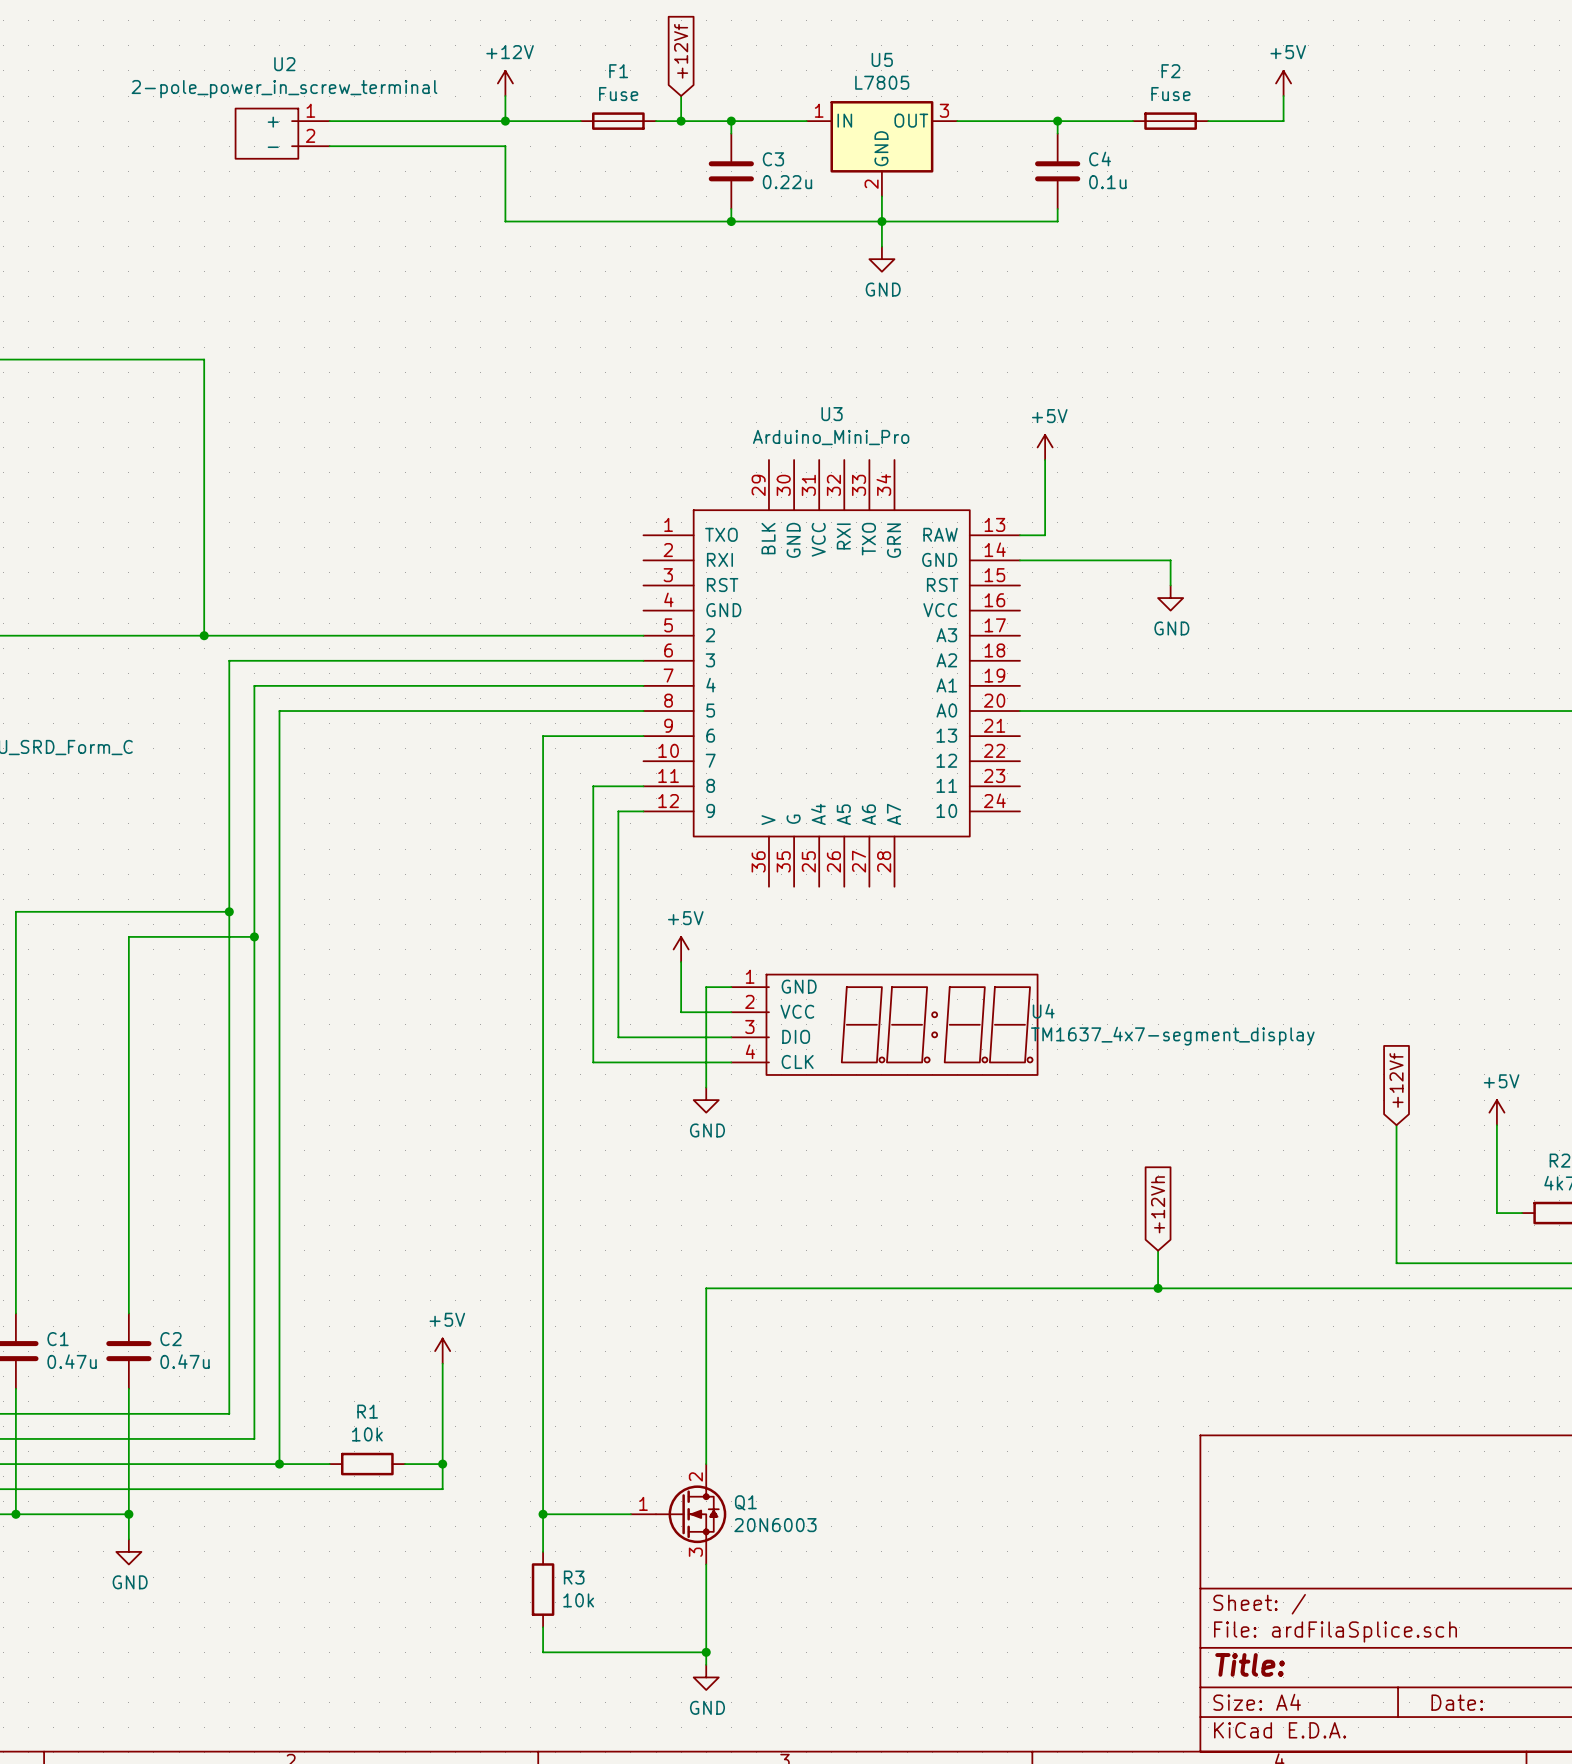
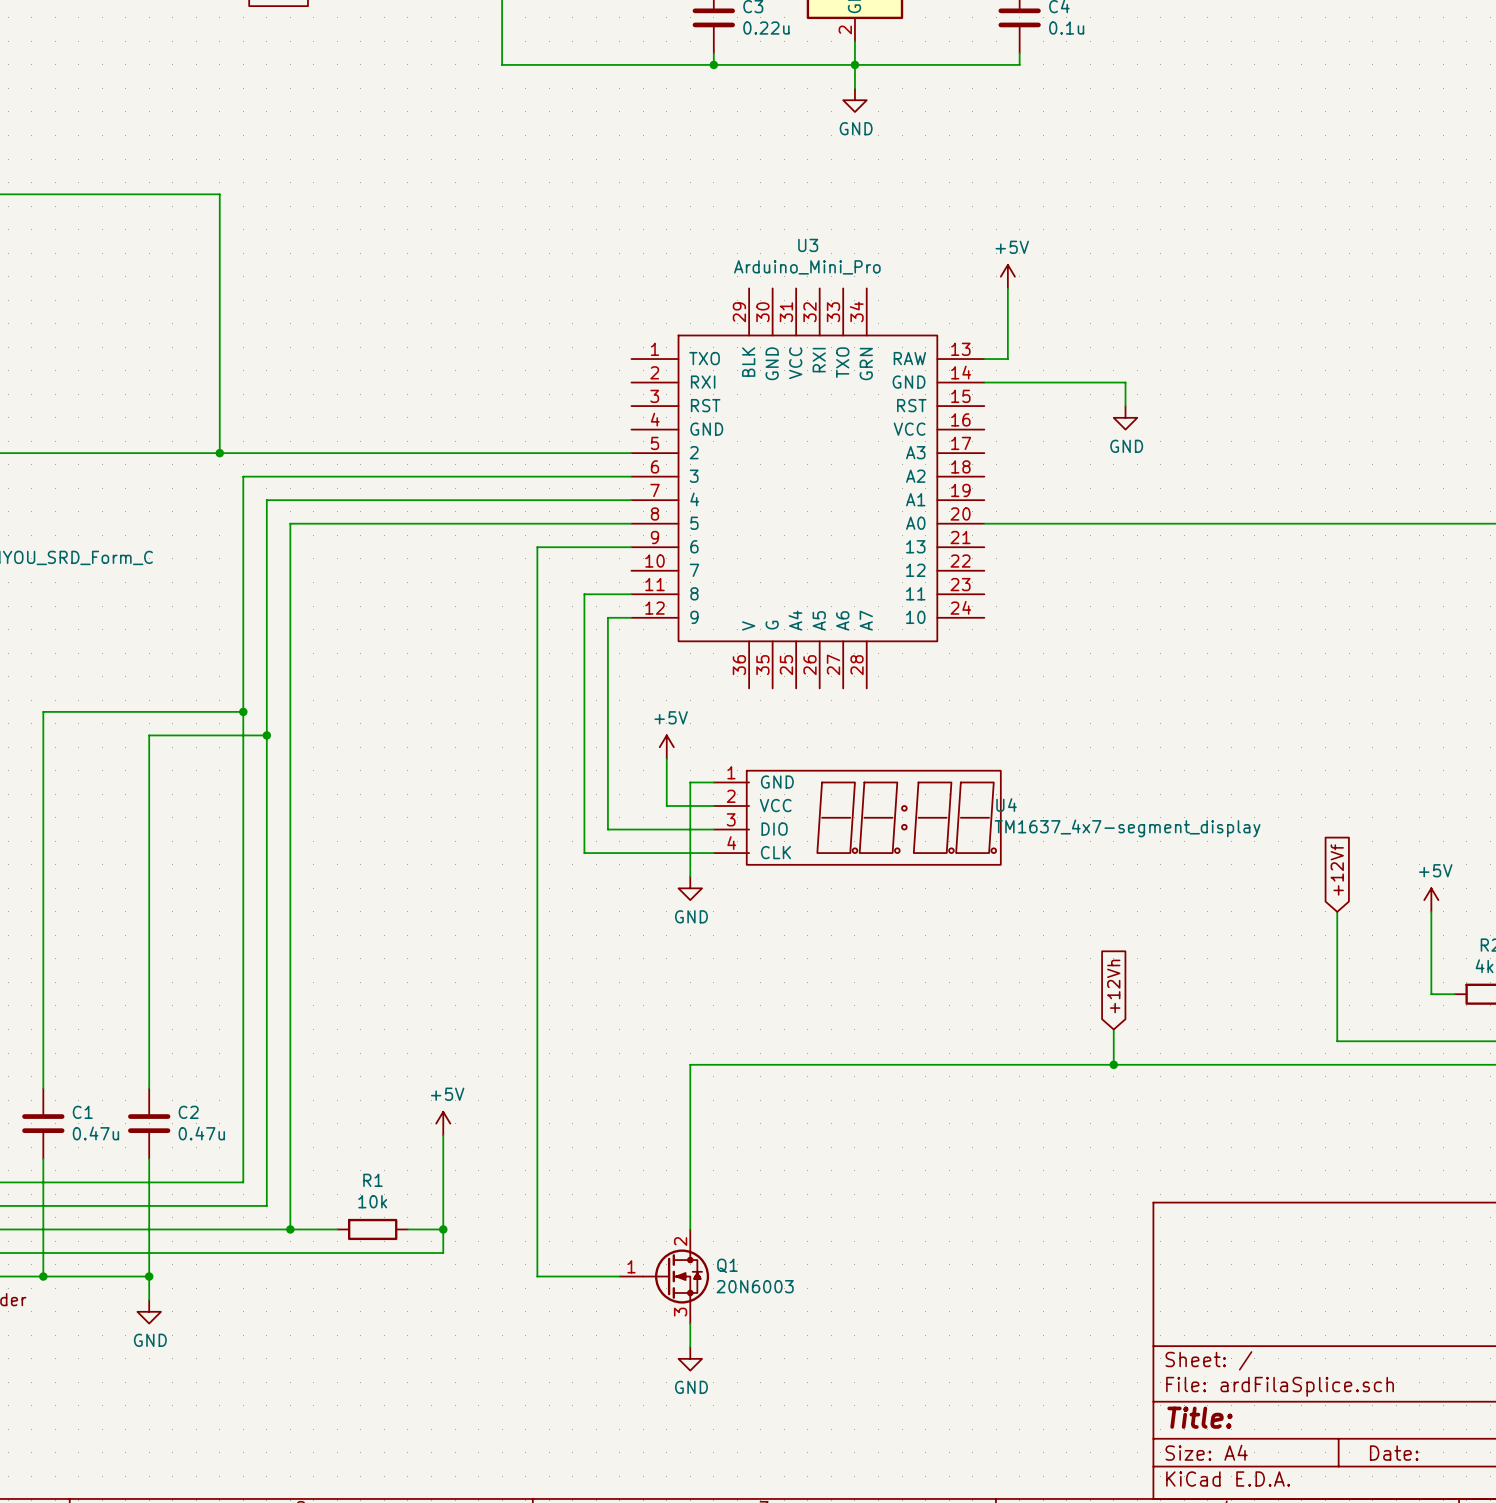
wire: (543, 1514) (543, 1551) -> none
junction: (543, 1514) -> none
R3: 10k (543, 1589) -> none
wire: (706, 1589) (706, 1664) -> none
wire: (543, 1627) (543, 1652) (706, 1652) -> none
junction: (706, 1652) -> none
power symbol position: GND (706, 1677) -> GND (690, 1358)

